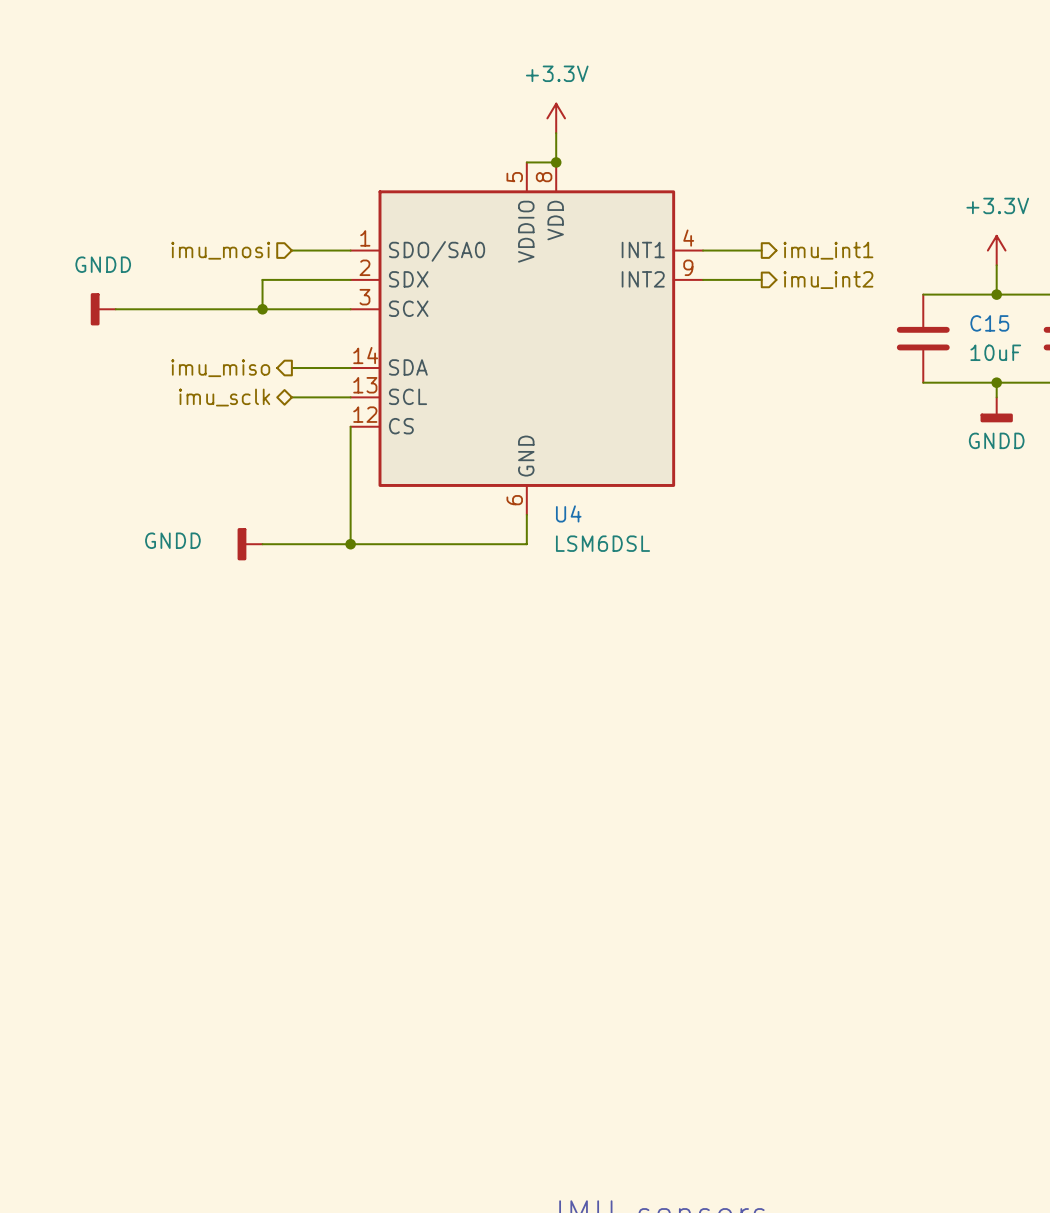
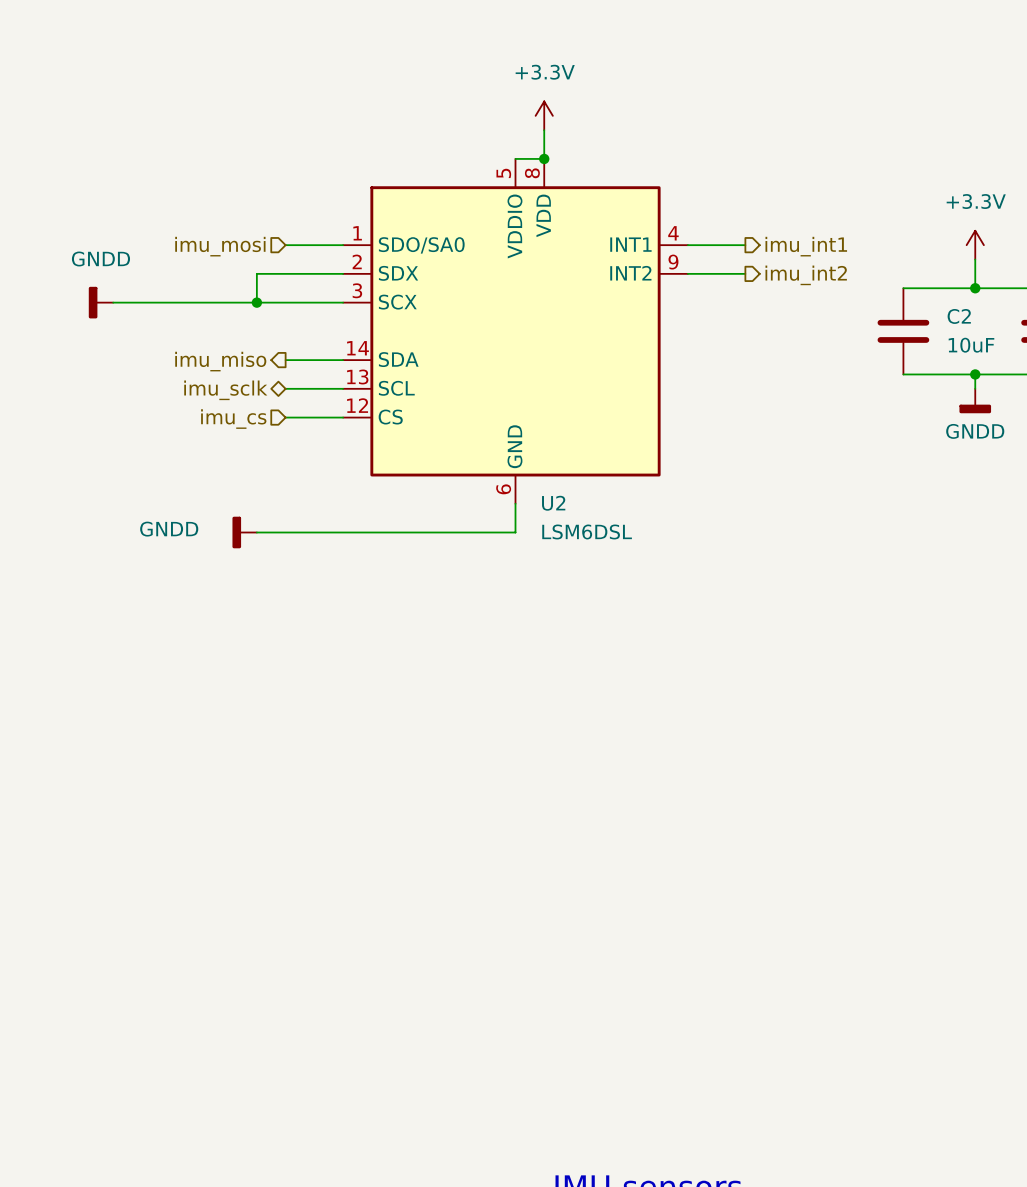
C15 name: C15 (989, 323) -> C2 (959, 316)
hierarchical label: none -> imu_cs (233, 419)
wire: (350, 426) (350, 544) -> (343, 417) (285, 417)
U4 name: U4 (568, 513) -> U2 (553, 503)
junction: (350, 544) -> none

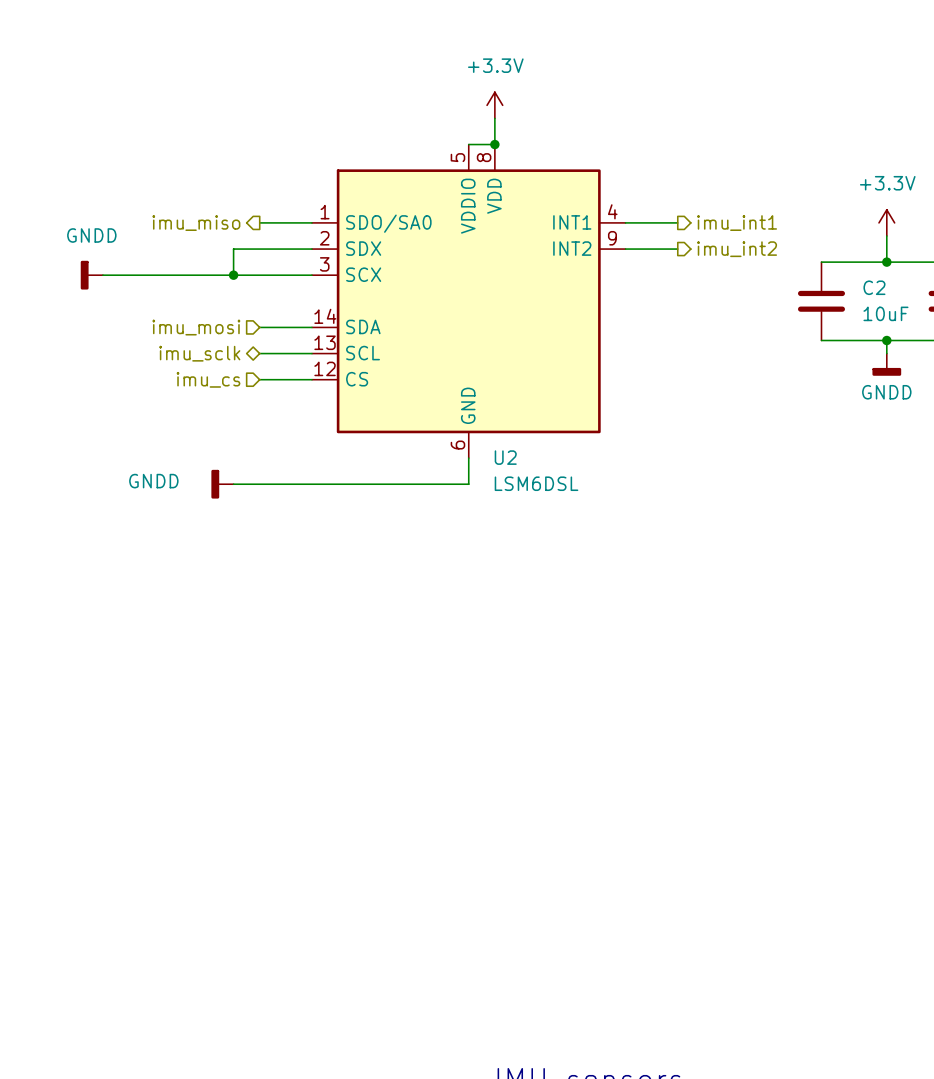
hierarchical label shape: input (220, 246) -> output (196, 223)
hierarchical label: imu_mosi (220, 246) -> imu_miso (196, 223)
hierarchical label shape: output (220, 361) -> input (196, 327)
hierarchical label: imu_miso (220, 361) -> imu_mosi (196, 327)

